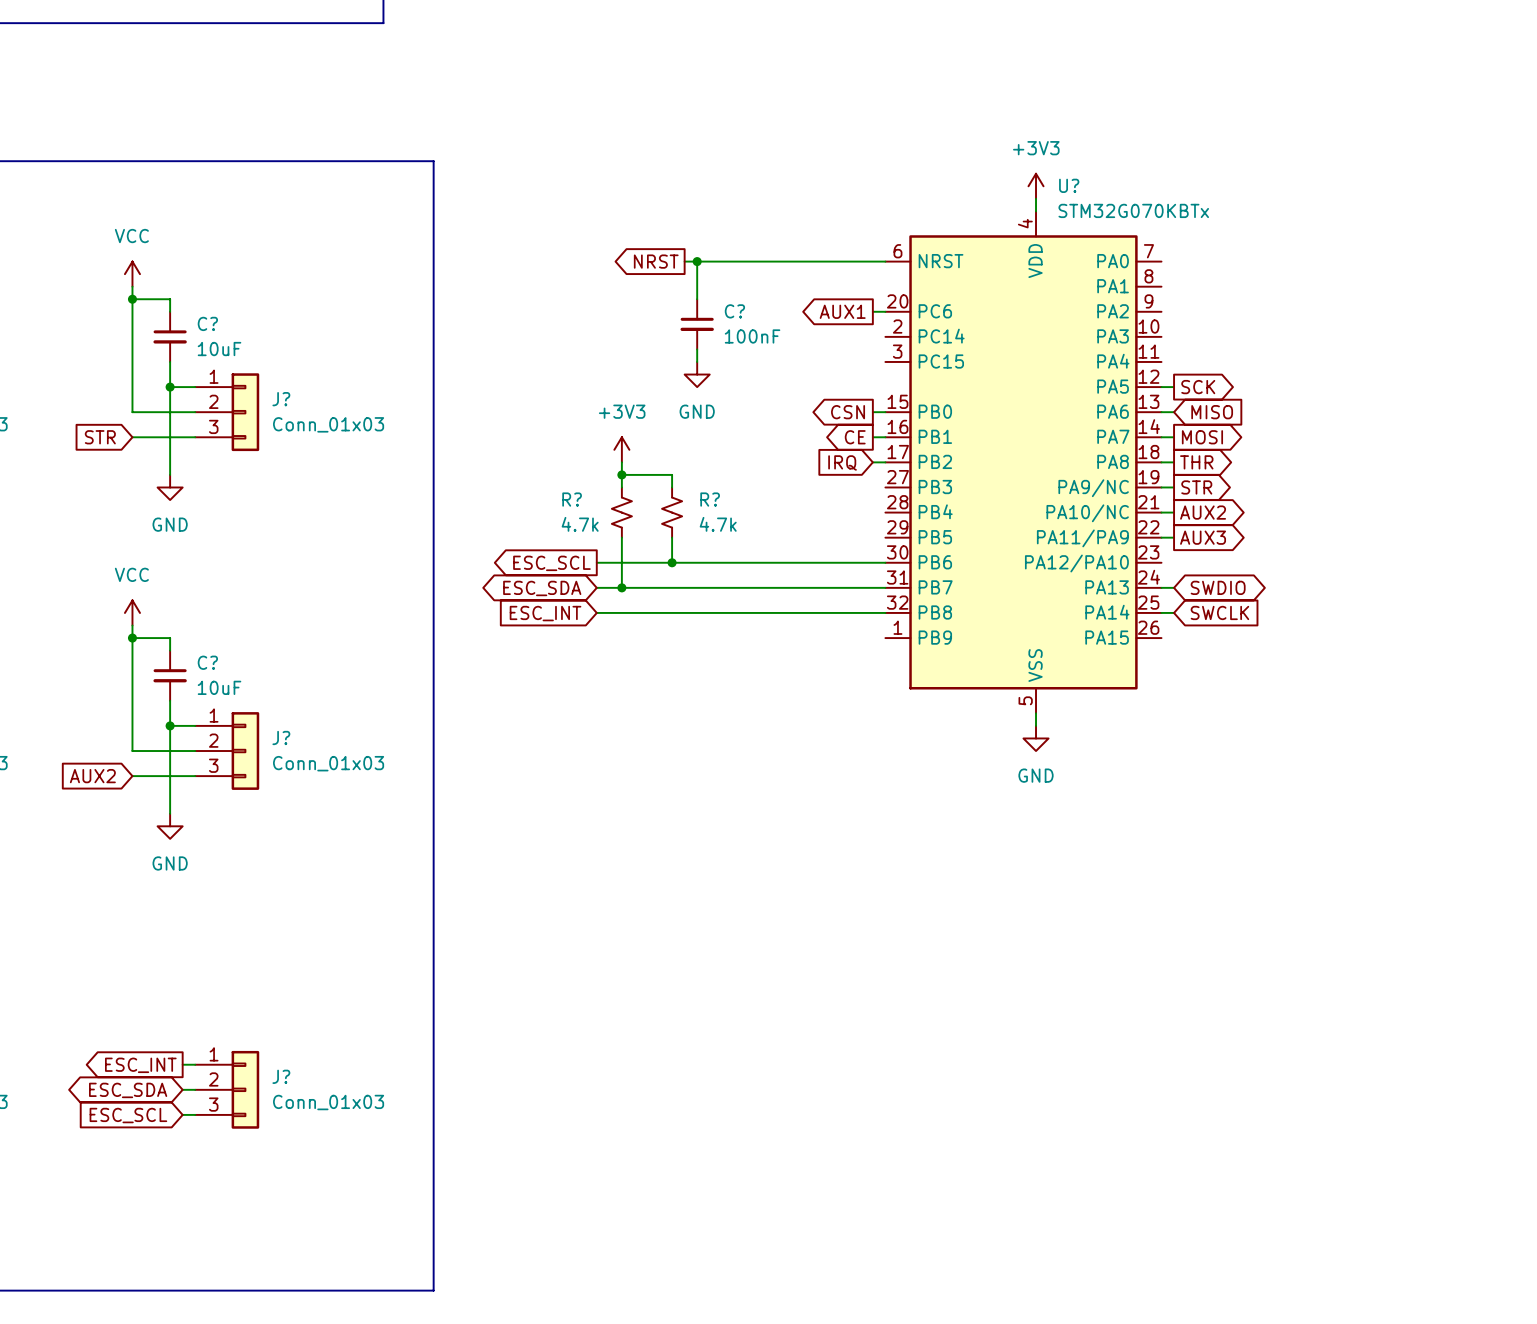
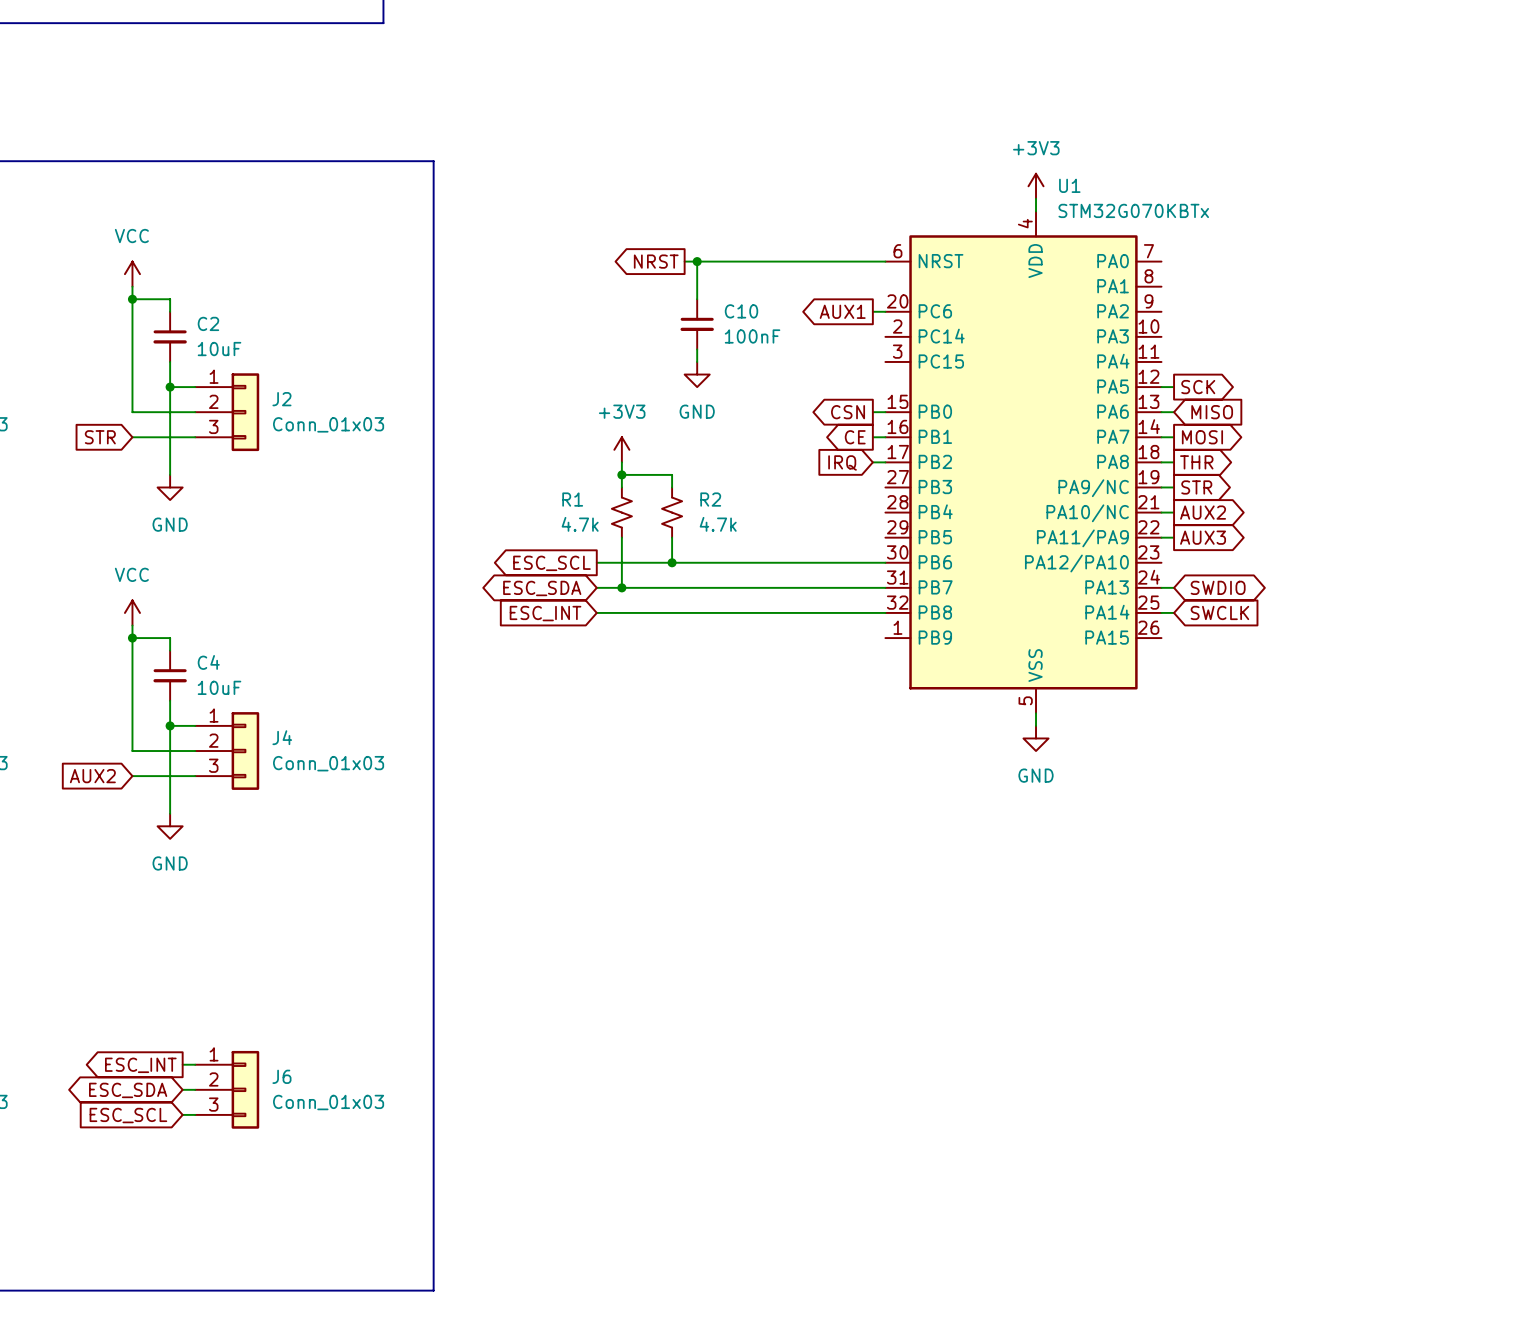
U? name: U? (1069, 185) -> U1 (1069, 185)
C? name: C? (734, 311) -> C10 (741, 311)
C? name: C? (207, 323) -> C2 (208, 323)
J? name: J? (281, 399) -> J2 (281, 399)
R? name: R? (572, 499) -> R1 (572, 499)
R? name: R? (710, 499) -> R2 (710, 499)
C? name: C? (207, 662) -> C4 (208, 662)
J? name: J? (281, 737) -> J4 (282, 737)
J? name: J? (281, 1076) -> J6 (281, 1076)

